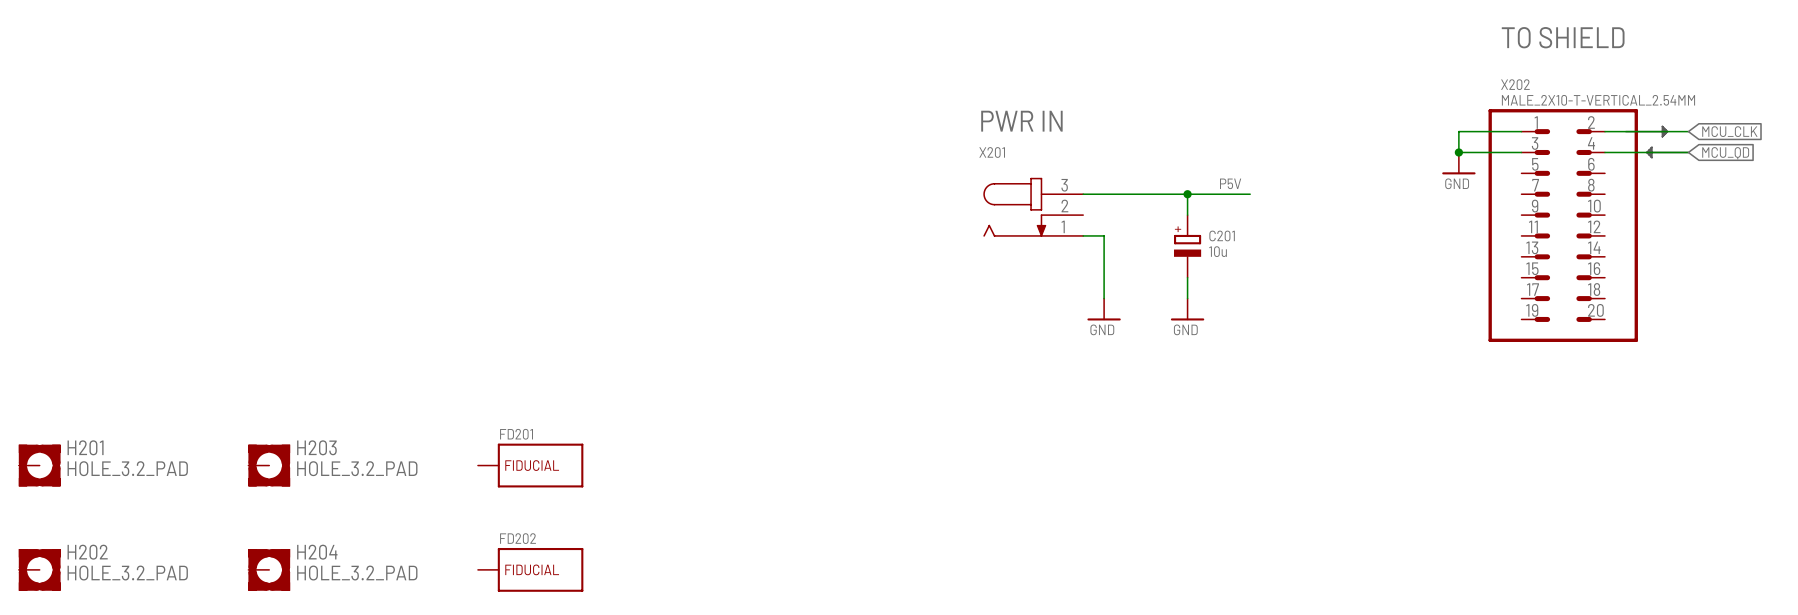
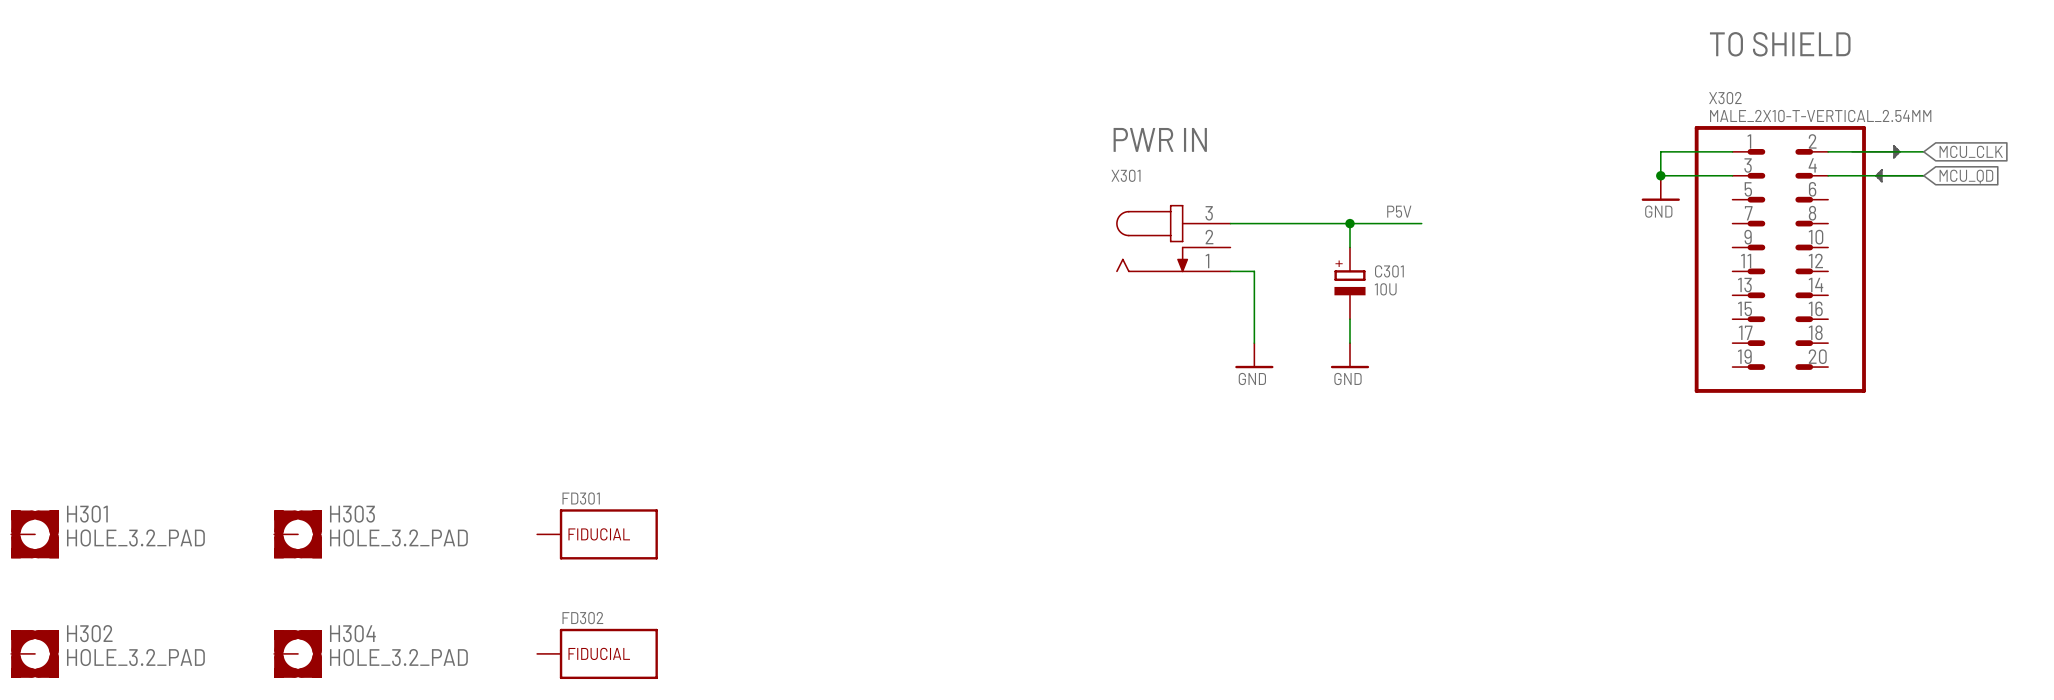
X202 name: X202 (1515, 84) -> X302 (1725, 98)
X201 name: X201 (992, 152) -> X301 (1126, 175)
C201 name: C201 (1222, 235) -> C301 (1389, 271)
C201 value: 10u (1218, 251) -> 10U (1385, 289)
FD201 name: FD201 (516, 434) -> FD301 (581, 498)
H201 name: H201 (85, 447) -> H301 (87, 514)
H203 name: H203 (316, 447) -> H303 (352, 514)
FD202 name: FD202 (518, 538) -> FD302 (582, 618)
H202 name: H202 (87, 552) -> H302 (89, 633)
H204 name: H204 (317, 552) -> H304 (352, 633)

